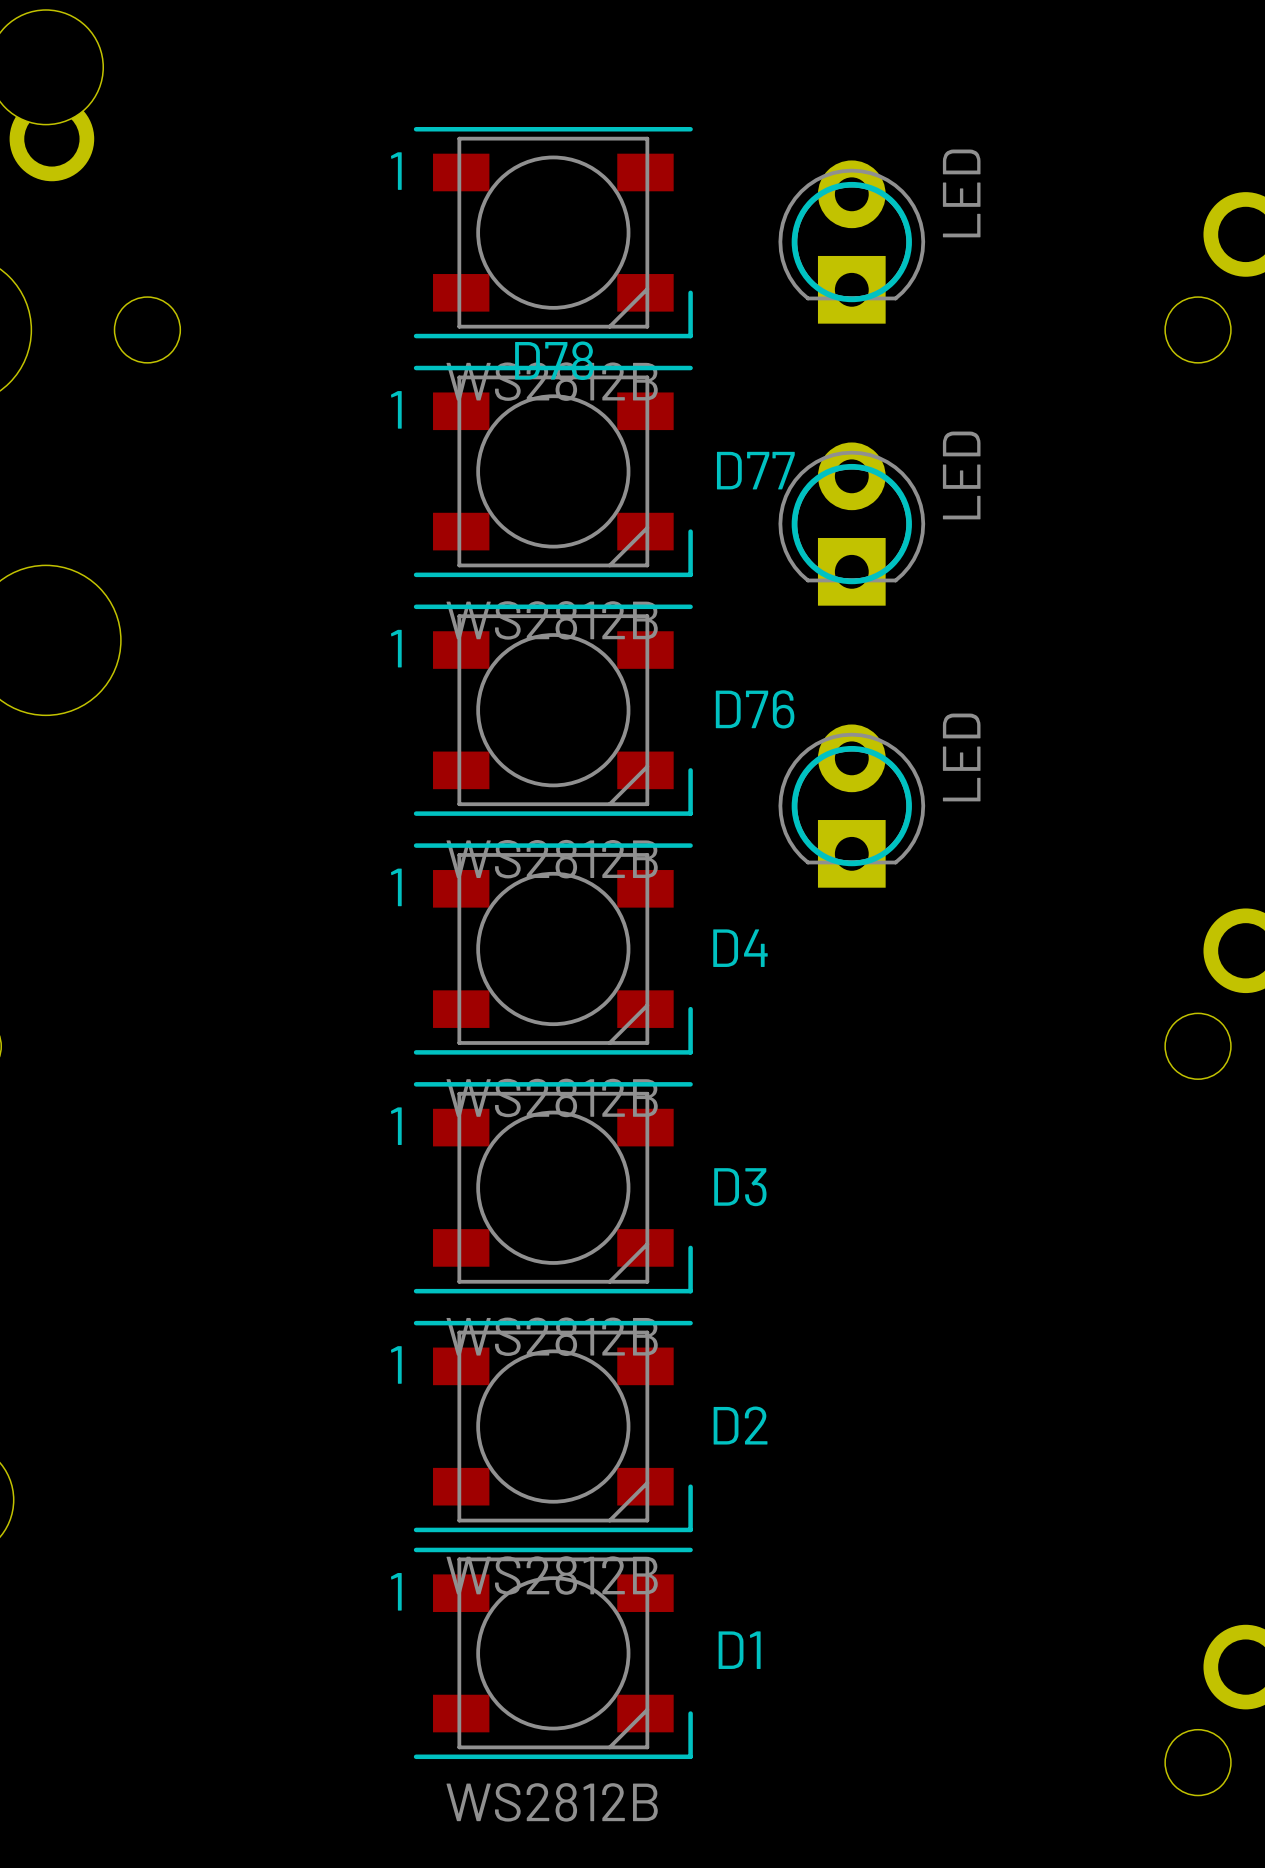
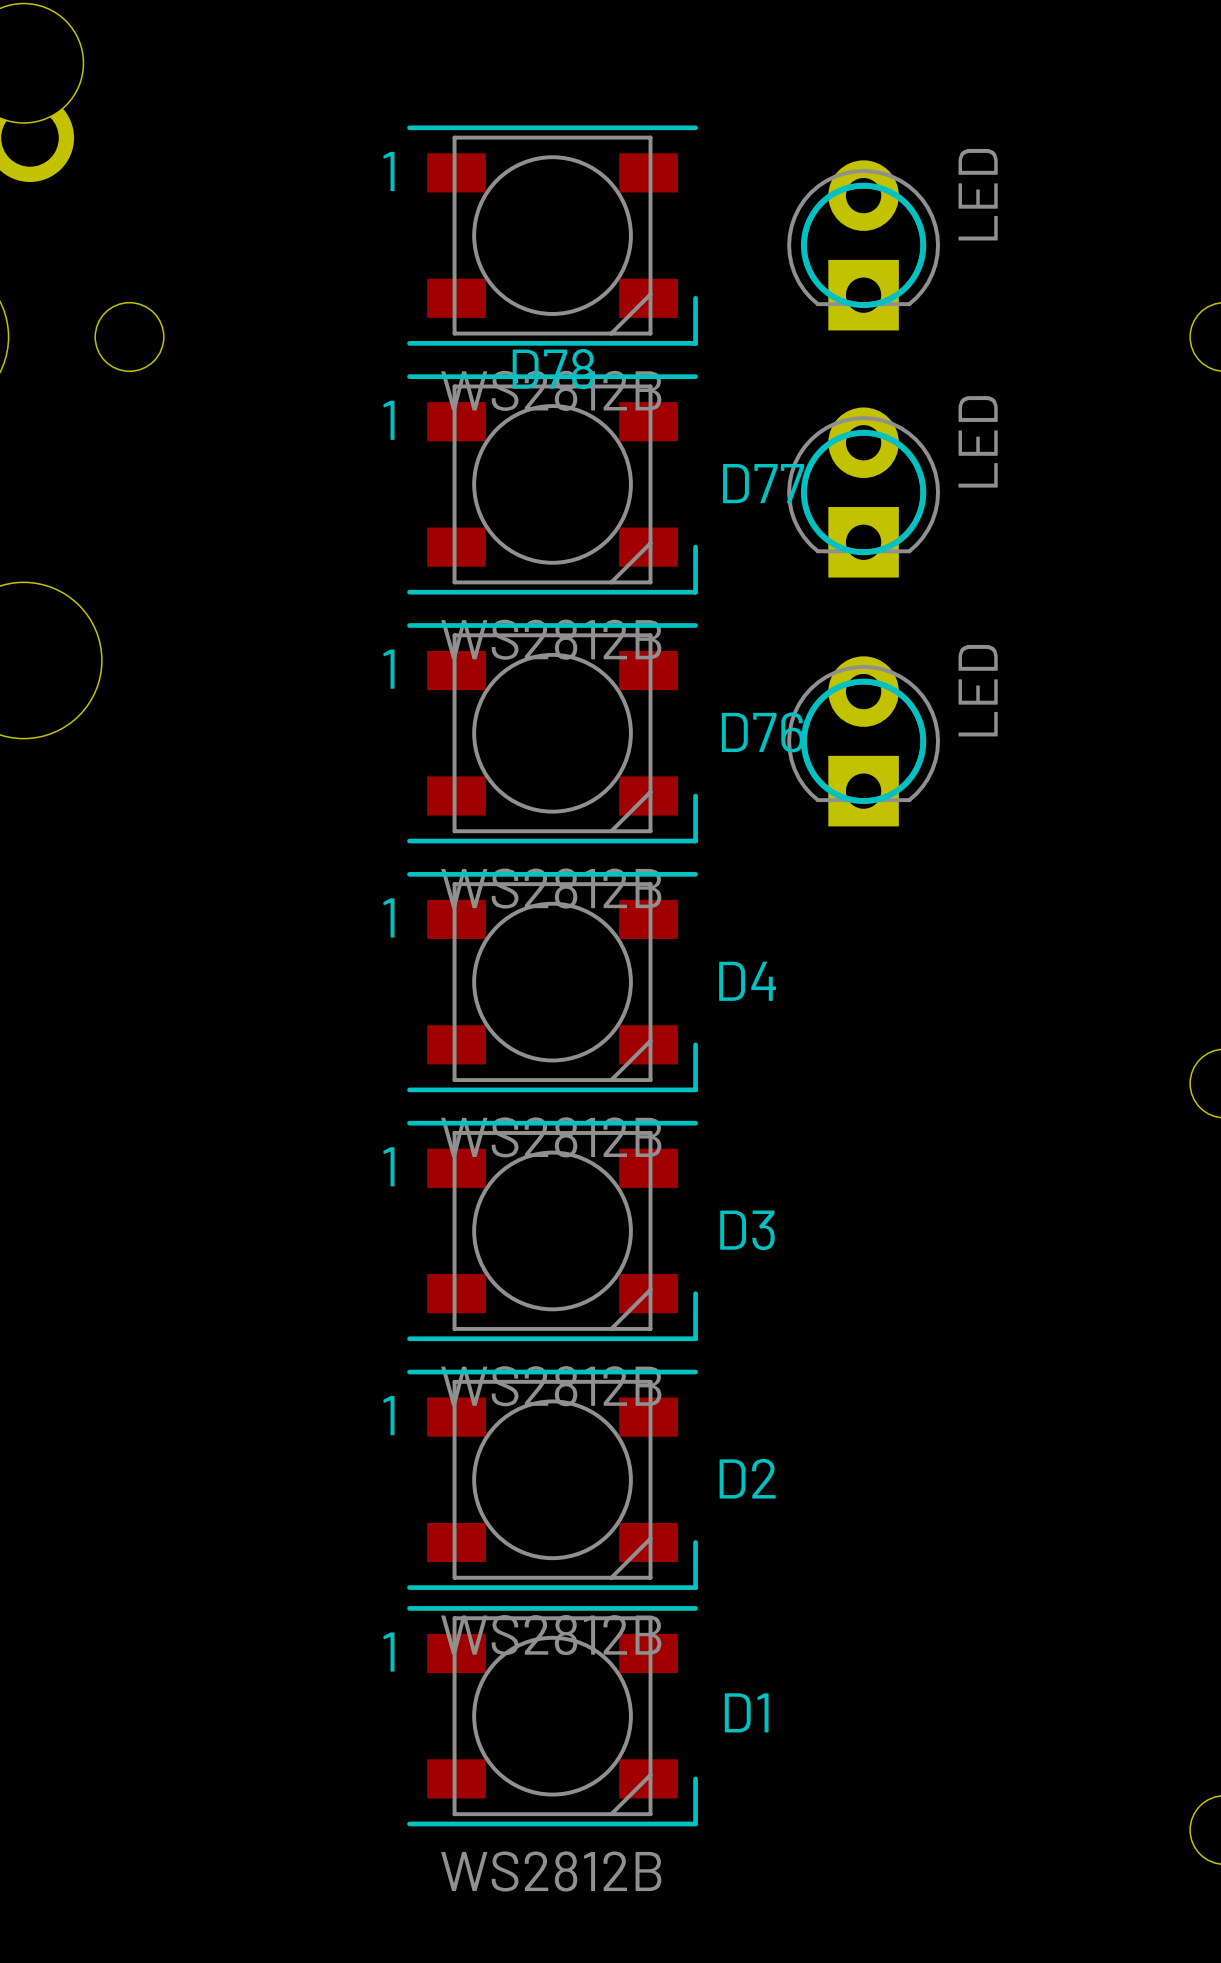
part position: (851, 524) -> (863, 492)
part position: (851, 806) -> (863, 741)

